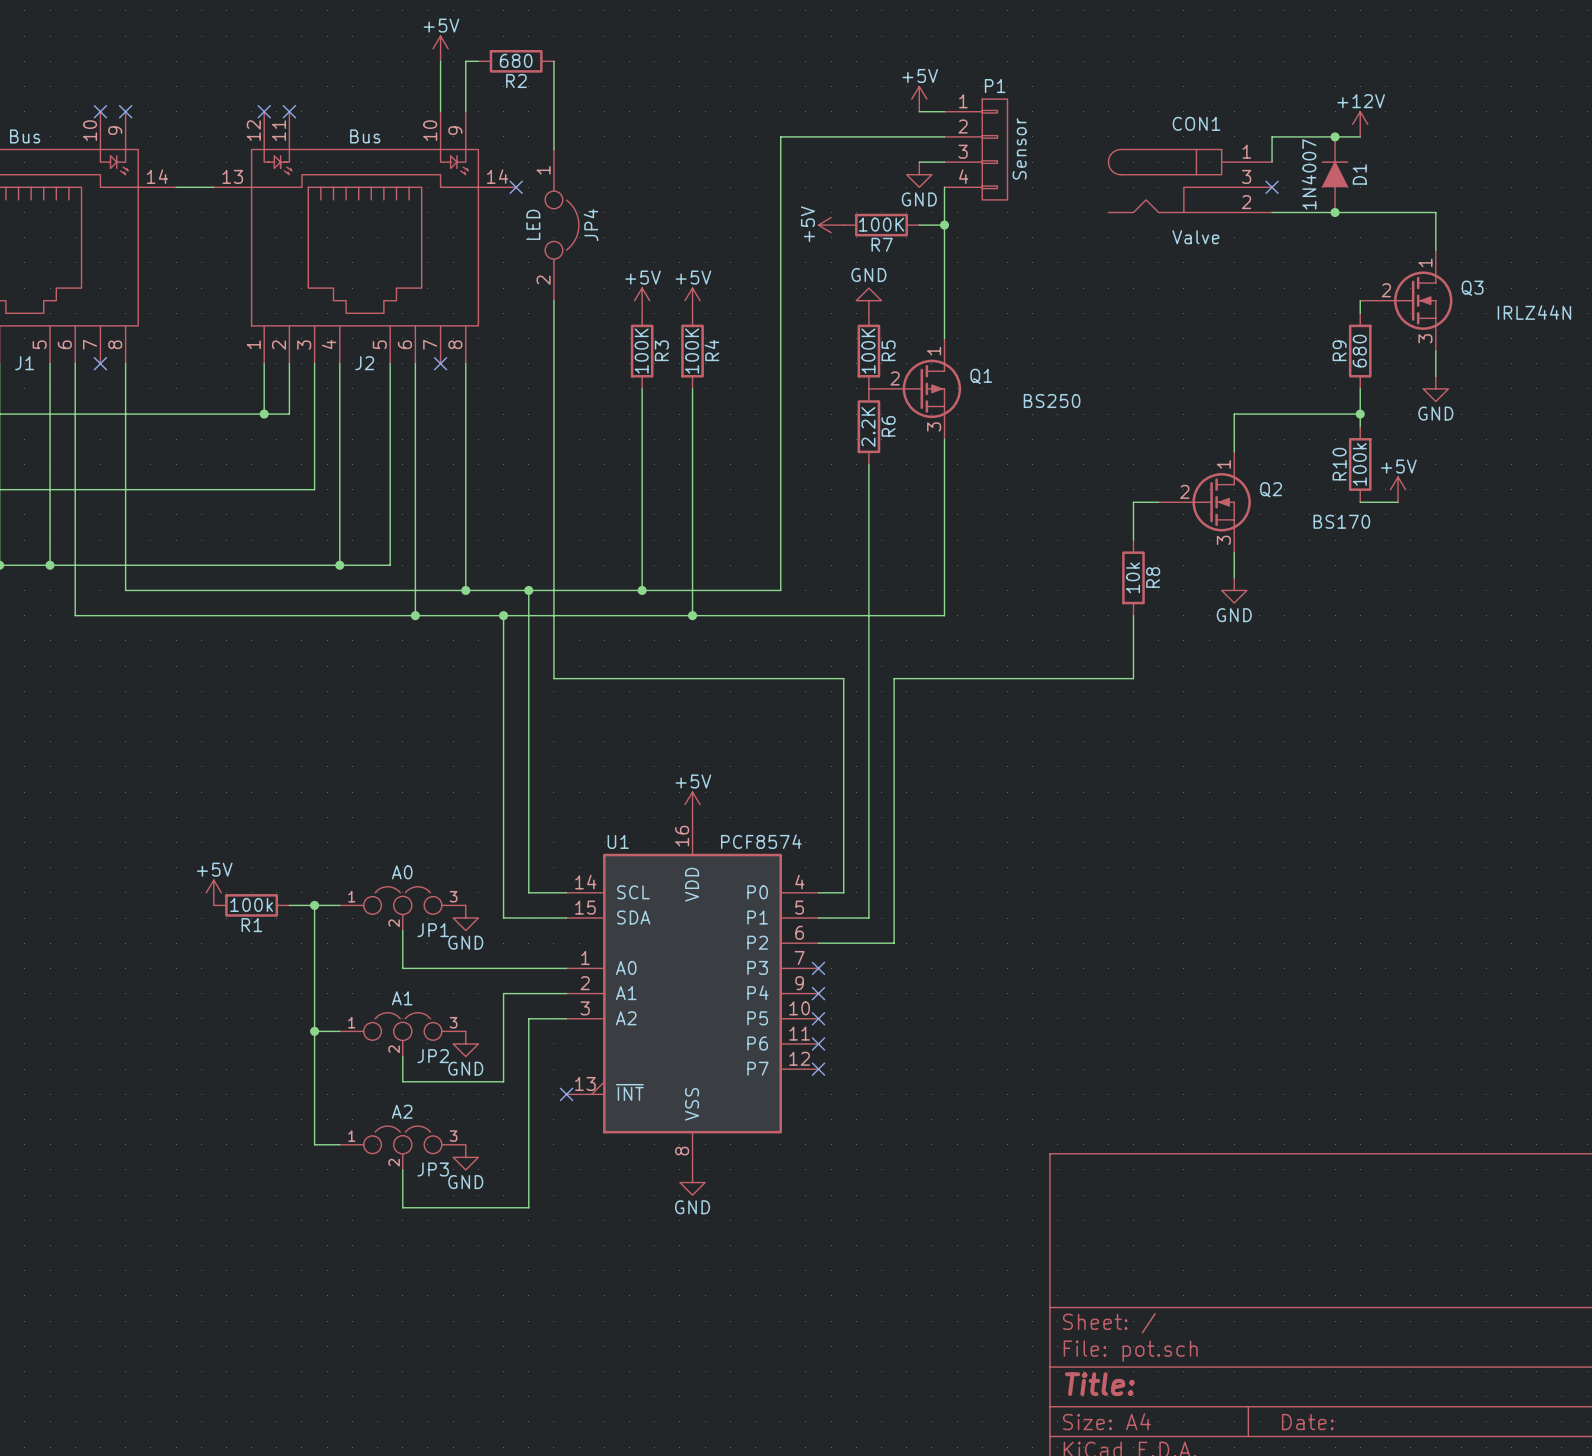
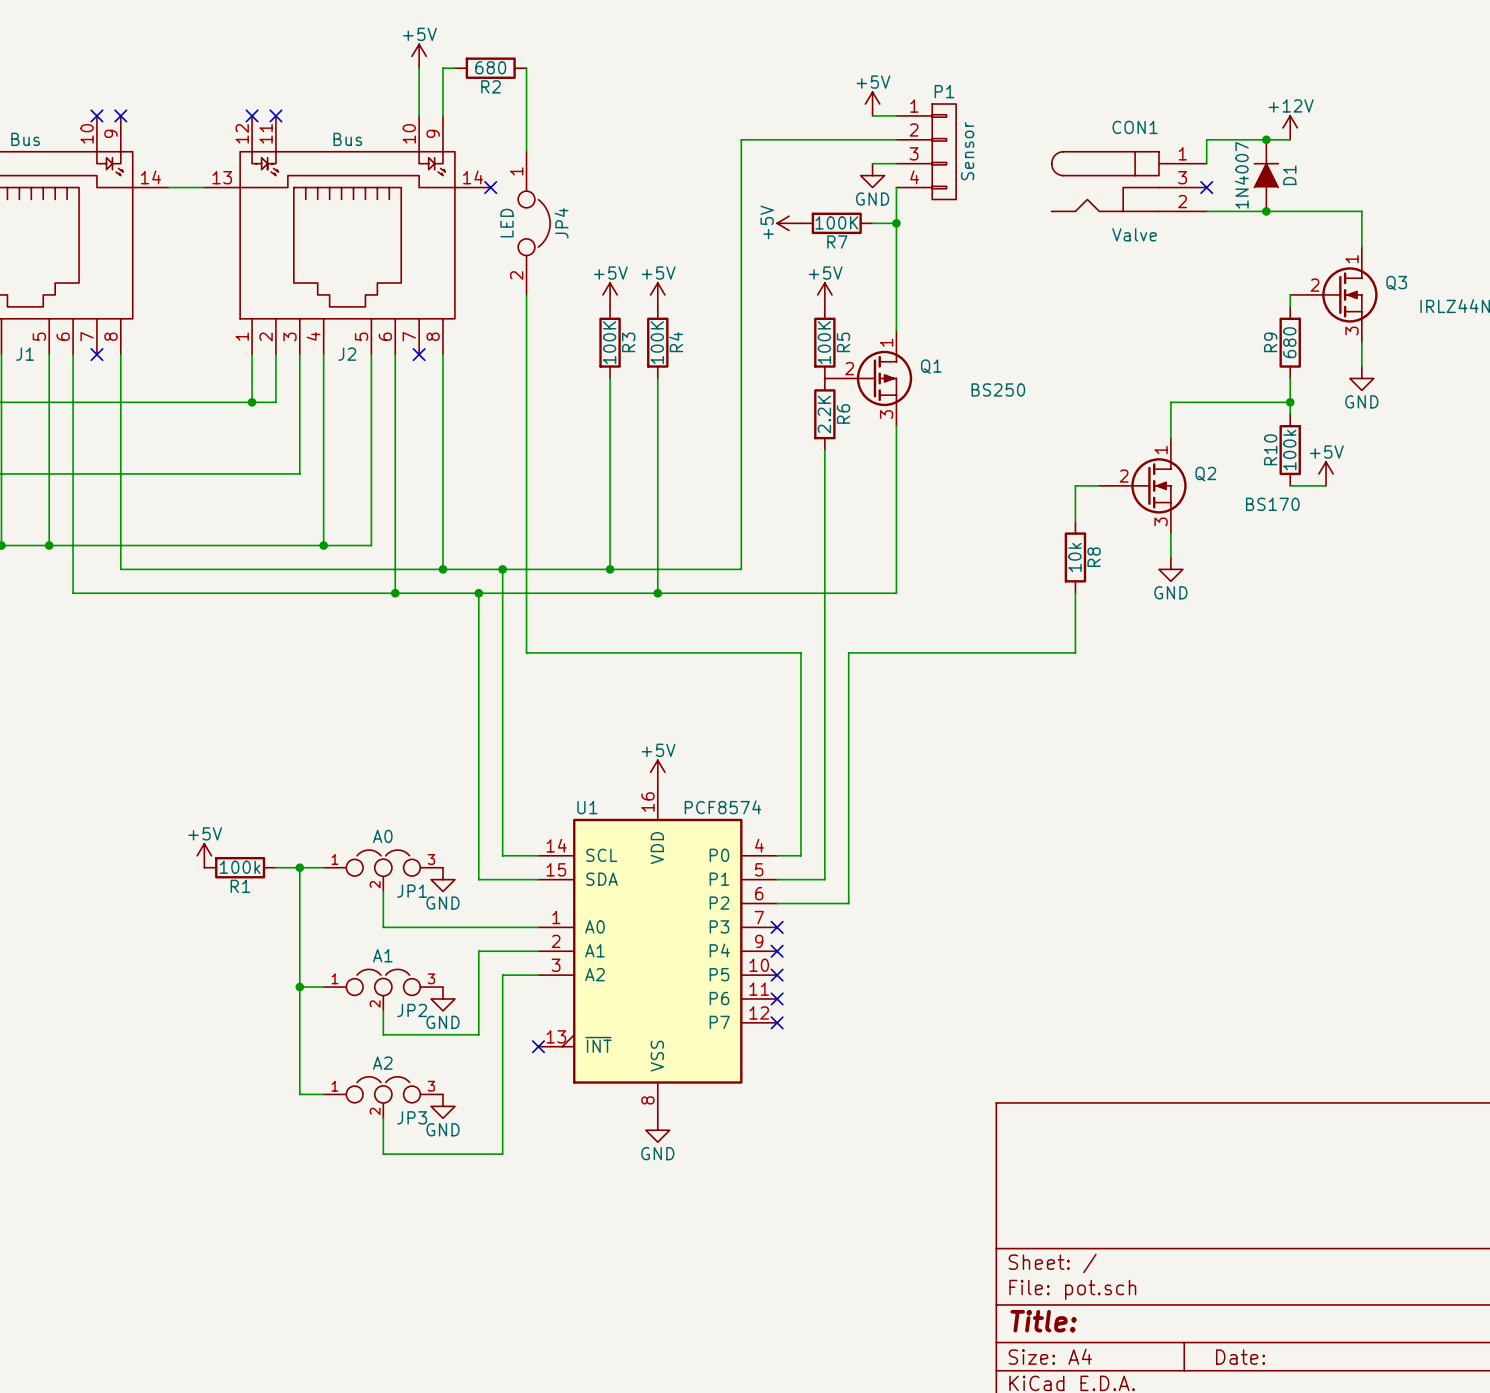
power symbol: GND (868, 300) -> +5V (824, 294)

